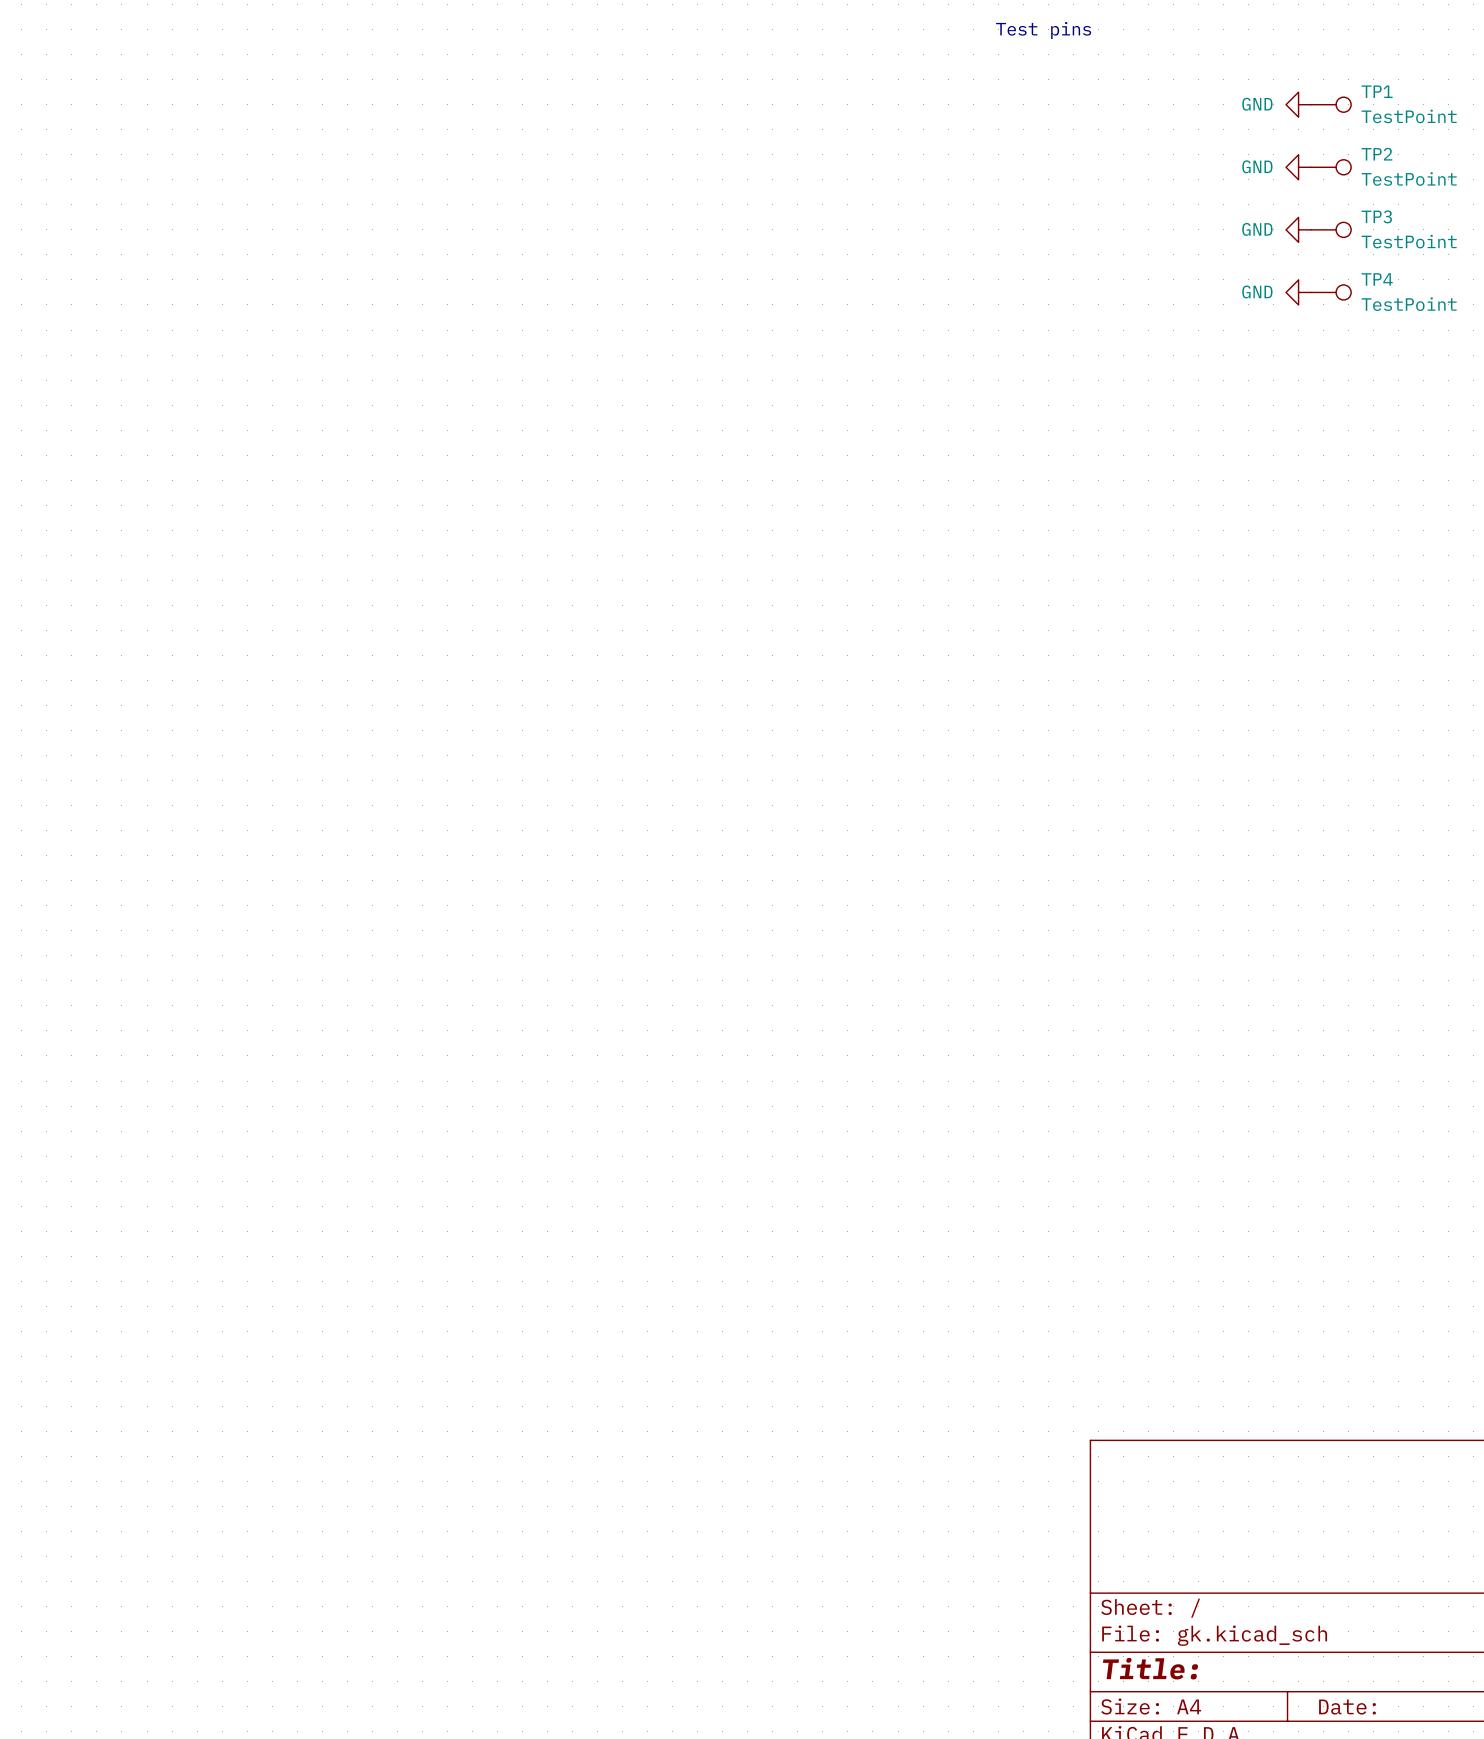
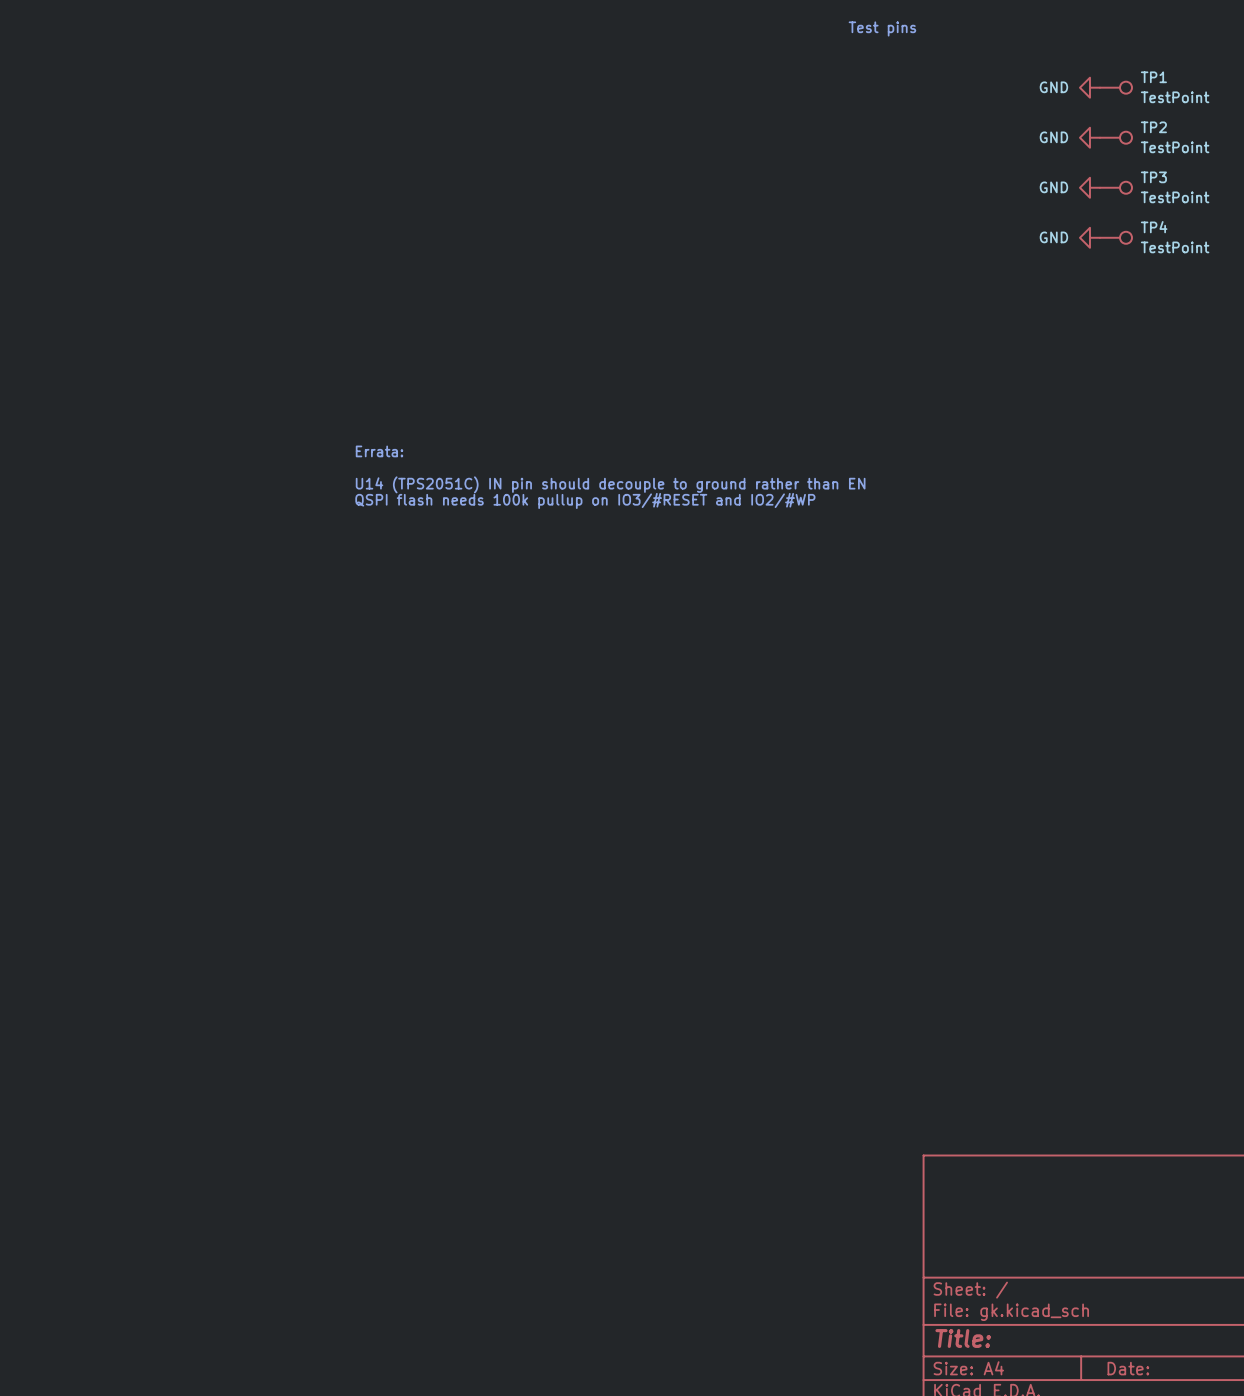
text: none -> Errata: (379, 451)
text: none -> U14 (TPS2051C) IN pin should decouple to ground rather than EN (610, 484)
text: none -> QSPI flash needs 100k pullup on IO3/#RESET and IO2/#WP (585, 500)

